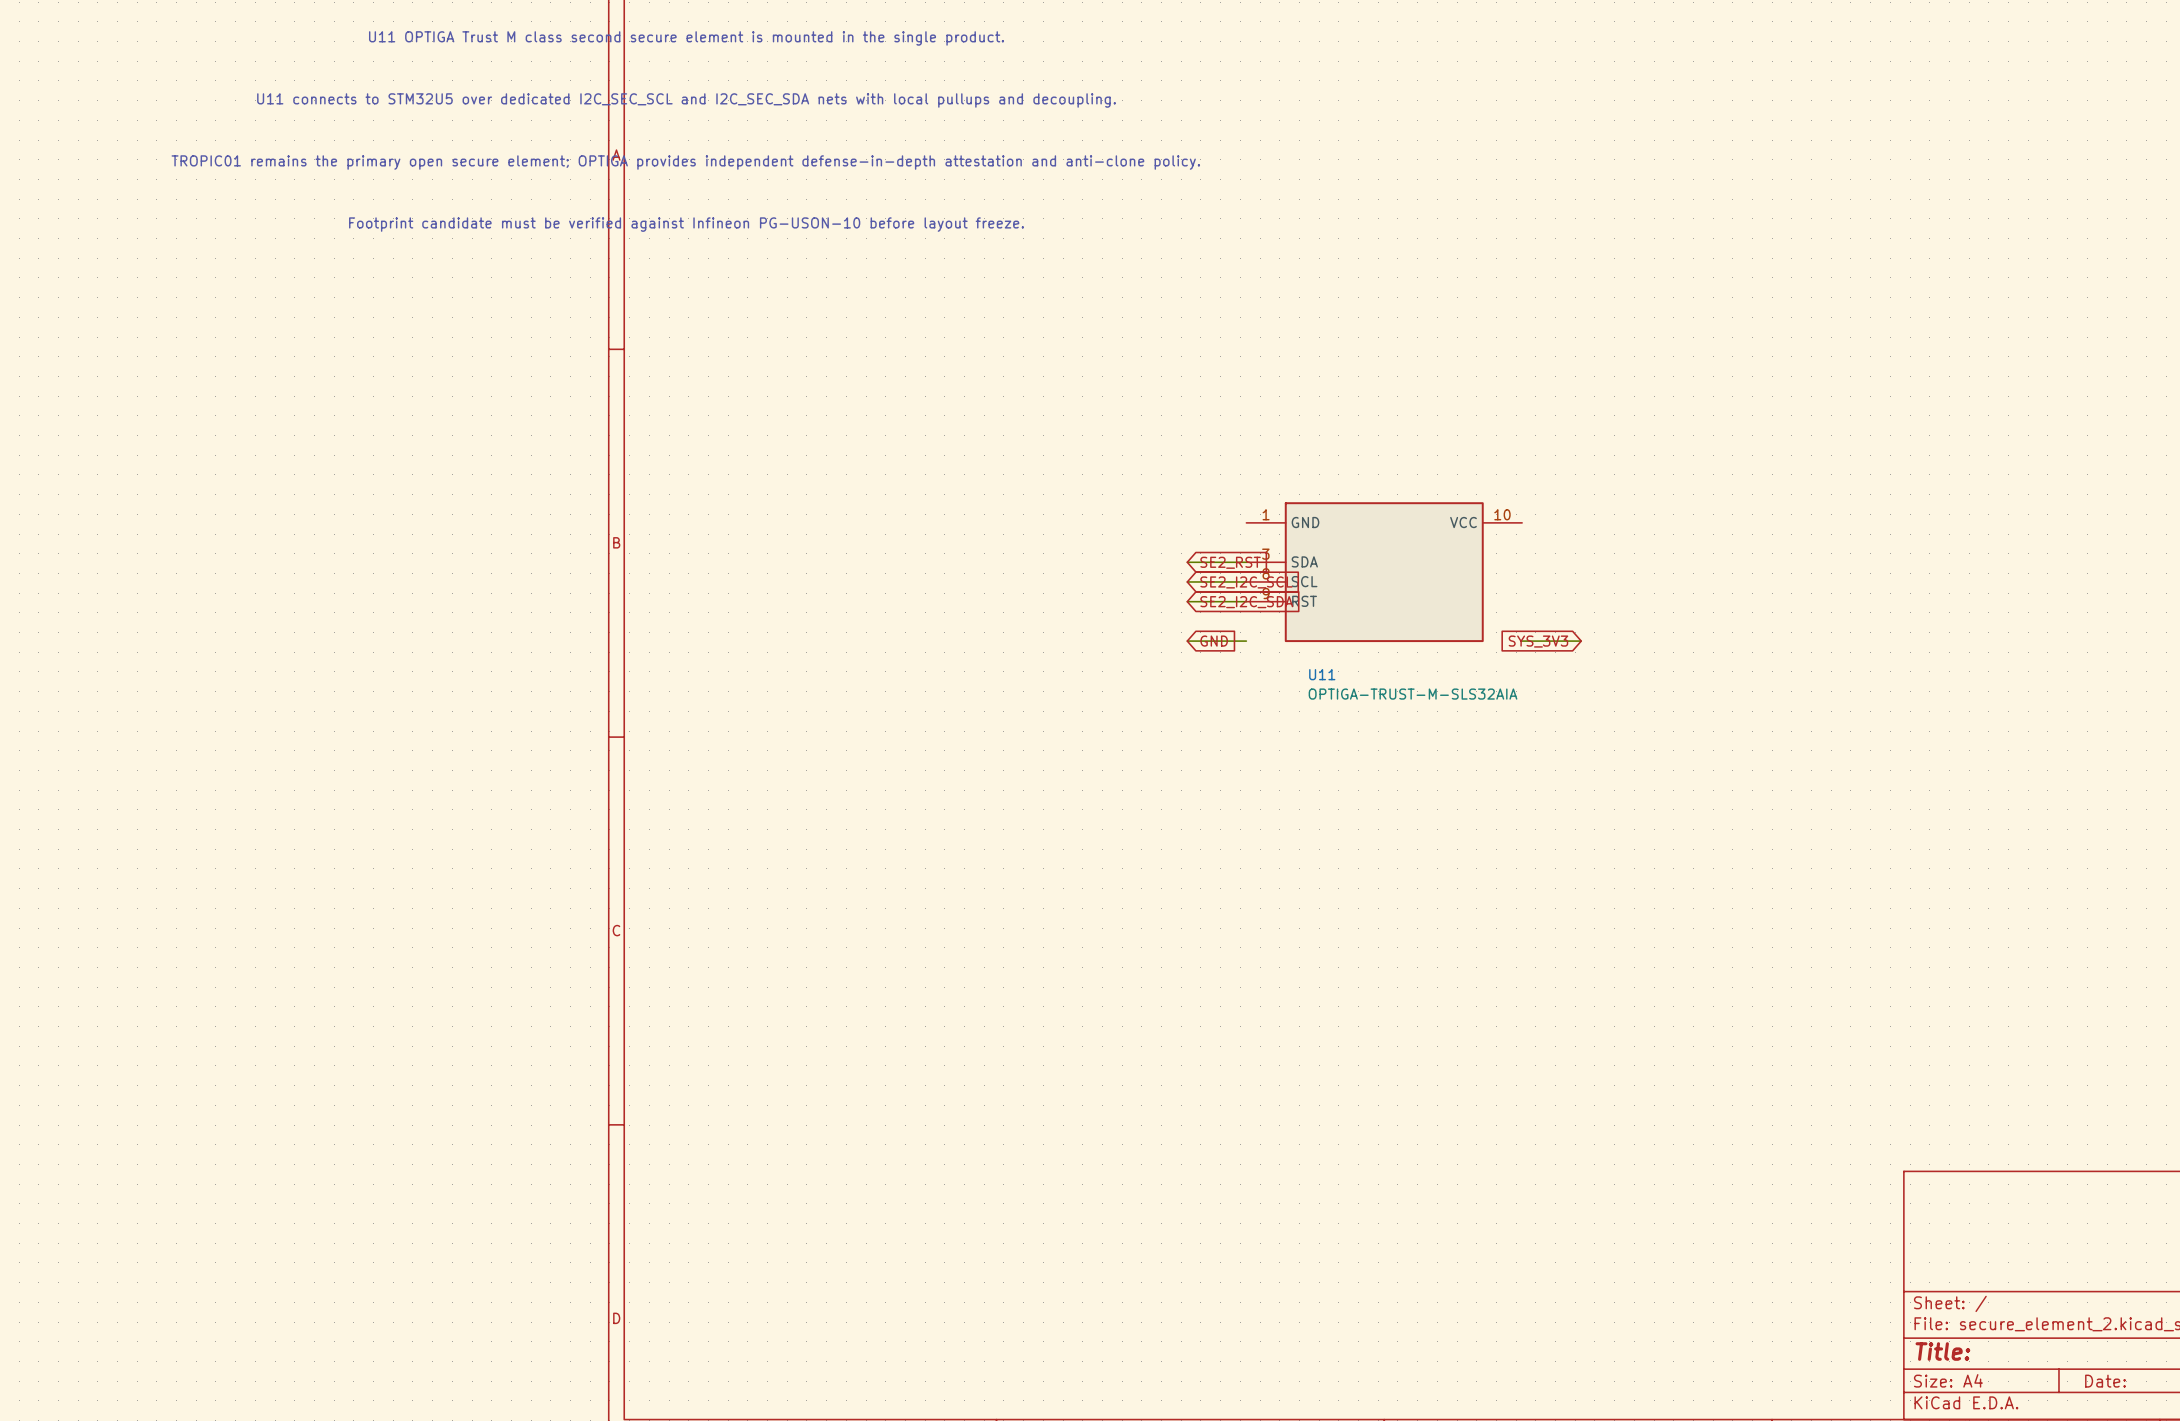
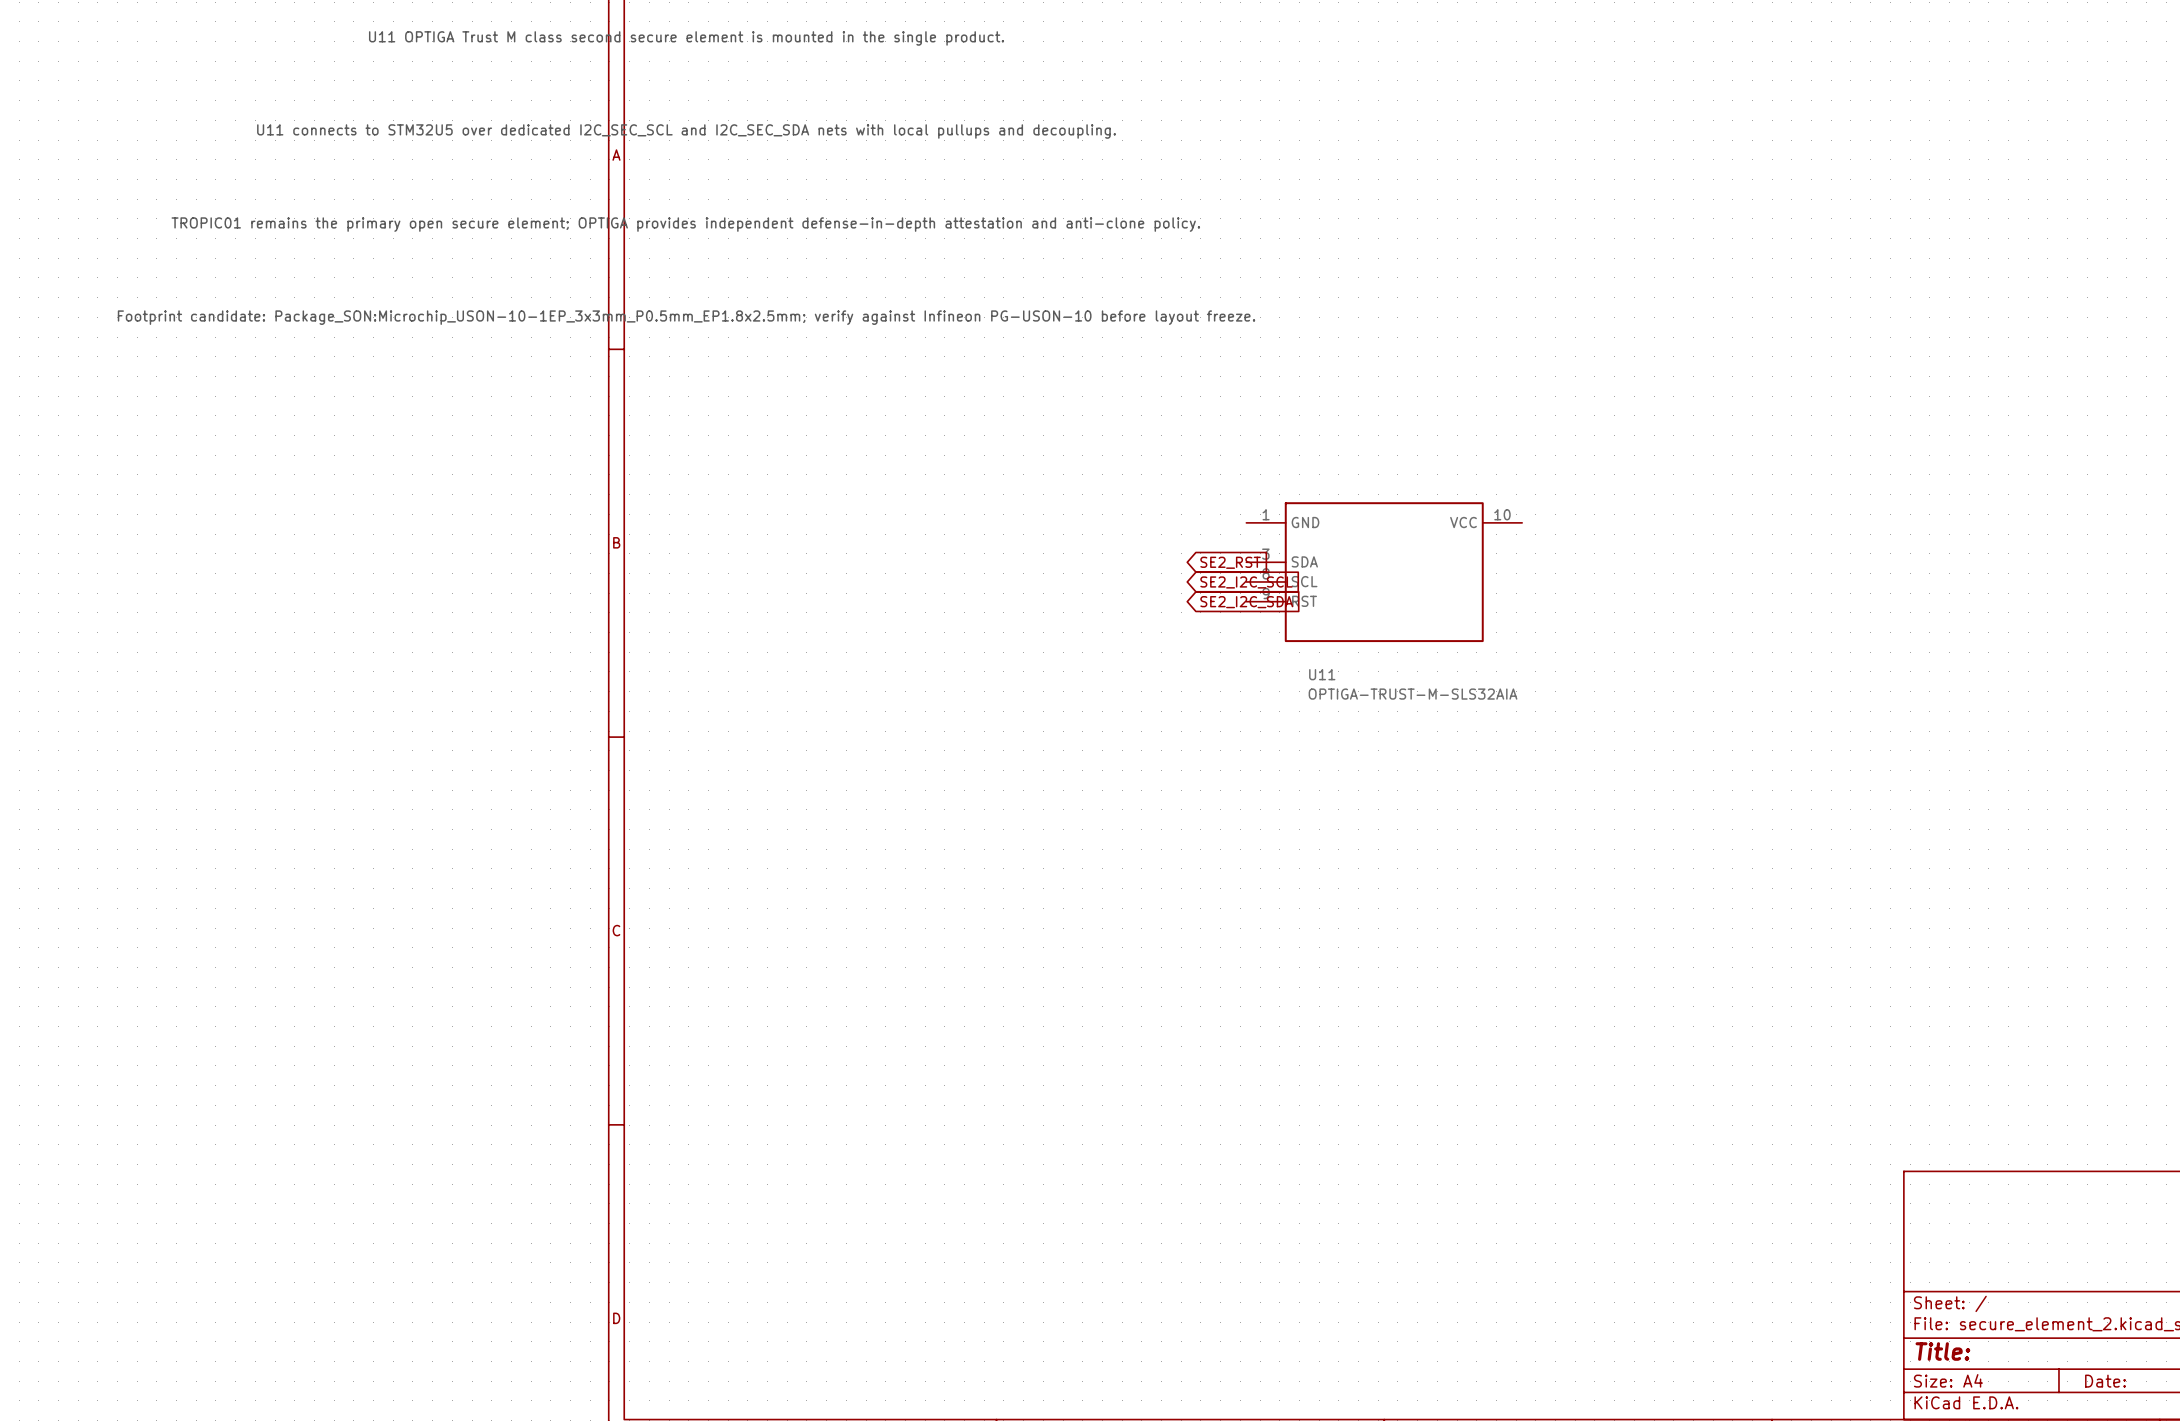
text position: U11 connects to STM32U5 over dedicated I2C_SEC_SCL and I2C_SEC_SDA nets with local pullups and decoupling. (686, 100) -> U11 connects to STM32U5 over dedicated I2C_SEC_SCL and I2C_SEC_SDA nets with local pullups and decoupling. (686, 131)
text: TROPIC01 remains the primary open secure element; OPTIGA provides independent defense-in-depth attestation and anti-clone policy. (685, 162) -> none
text: Footprint candidate must be verified against Infineon PG-USON-10 before layout freeze. (686, 224) -> TROPIC01 remains the primary open secure element; OPTIGA provides independent defense-in-depth attestation and anti-clone policy. (685, 224)
text: none -> Footprint candidate: Package_SON:Microchip_USON-10-1EP_3x3mm_P0.5mm_EP1.8x2.5mm; verify against Infineon PG-USON-10 before layout freeze. (686, 317)
wire: (1187, 562) (1246, 562) -> none
wire: (1187, 581) (1246, 581) -> none
wire: (1187, 601) (1246, 601) -> none
wire: (1187, 641) (1246, 641) -> none
global label: GND (1214, 641) -> none
wire: (1522, 641) (1581, 641) -> none
global label: SYS_3V3 (1538, 641) -> none

